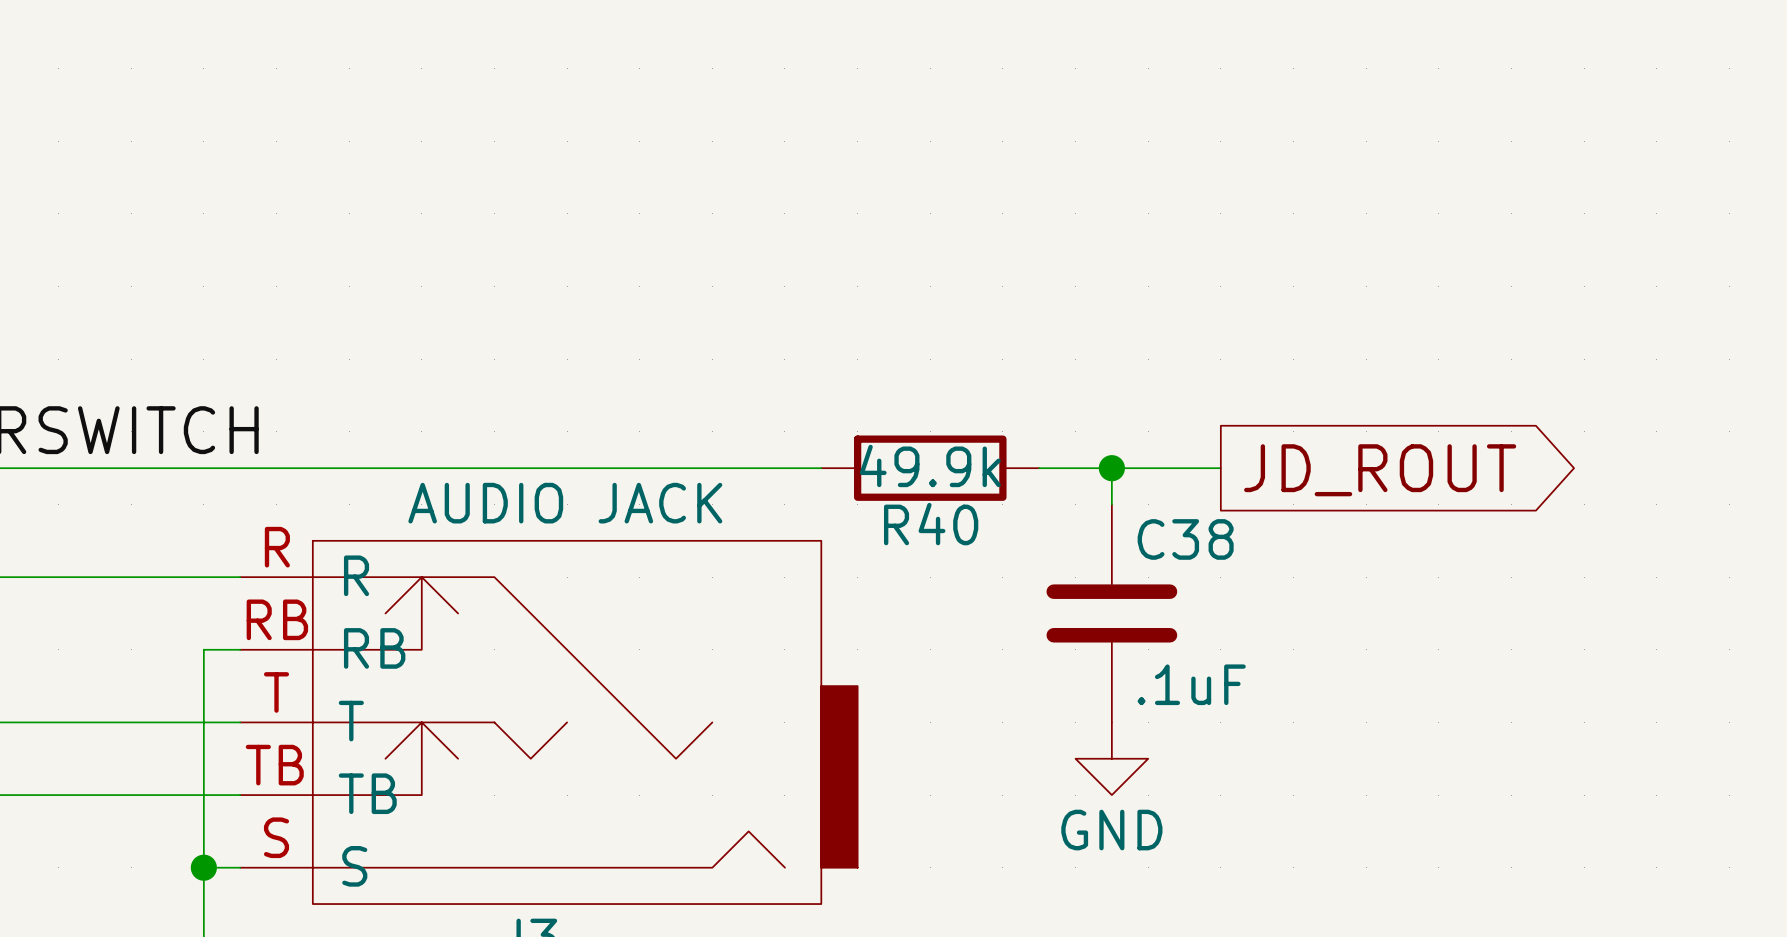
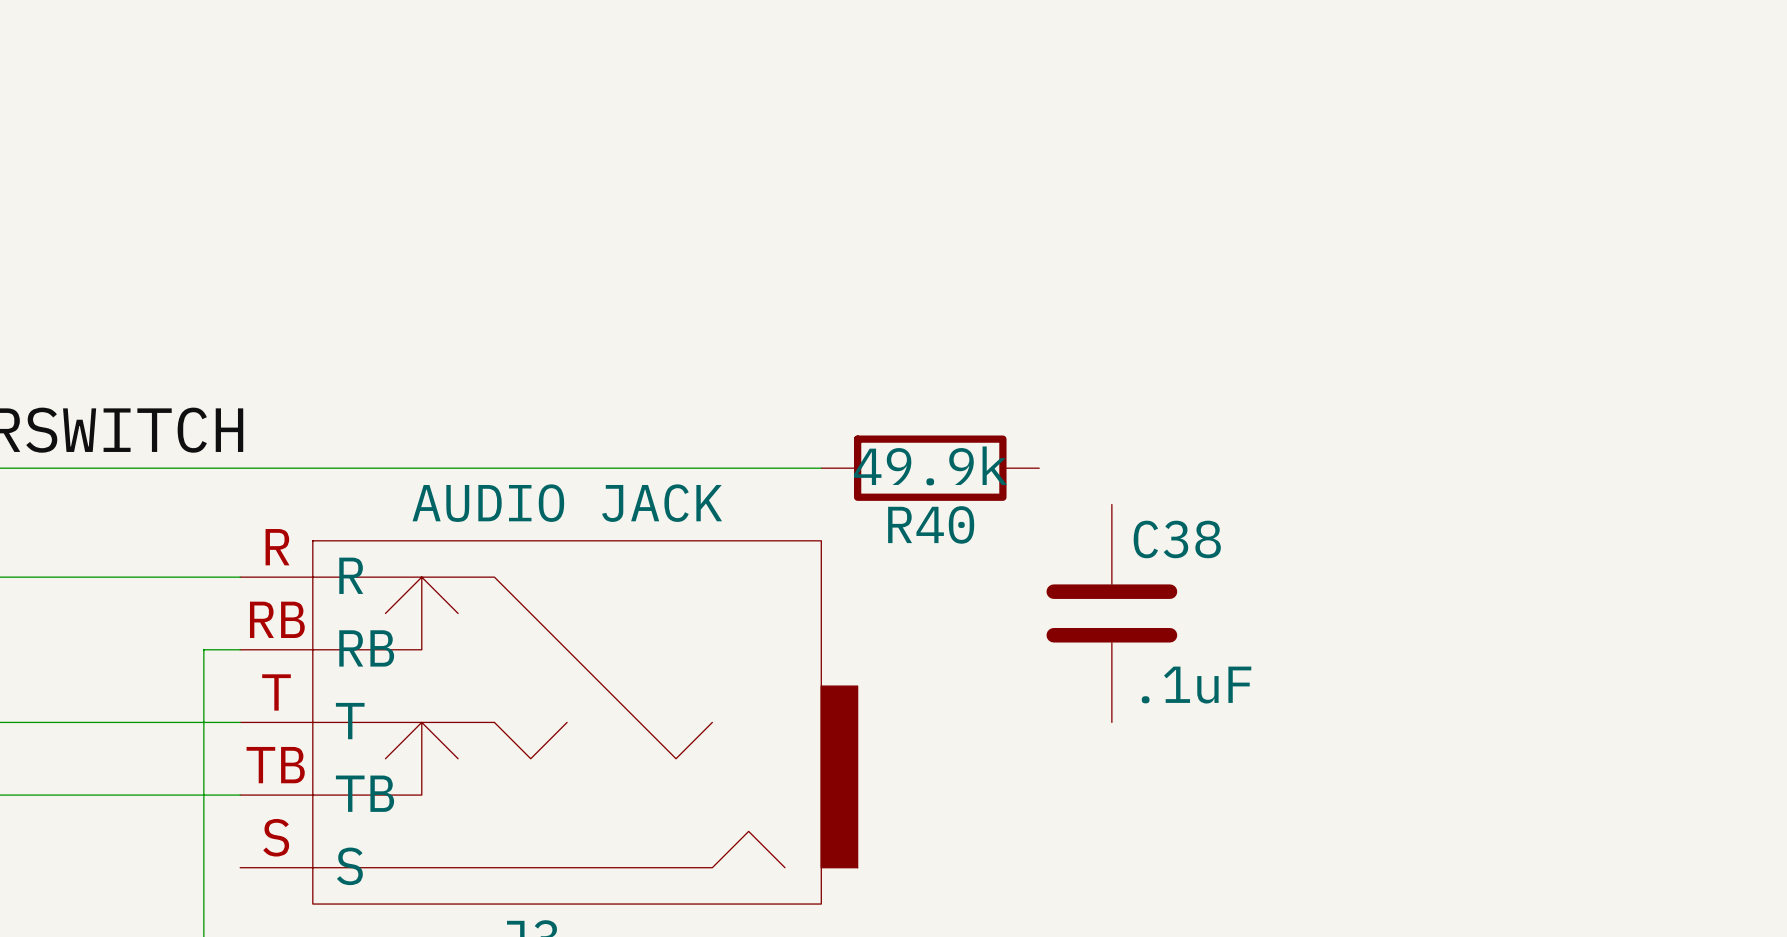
wire: (1039, 468) (1220, 468) -> none
wire: (1111, 468) (1111, 504) -> none
junction: (1111, 468) -> none
global label: JD_ROUT (1380, 470) -> none
power symbol: GND (1111, 758) -> none
wire: (203, 867) (240, 867) -> none
junction: (203, 867) -> none

